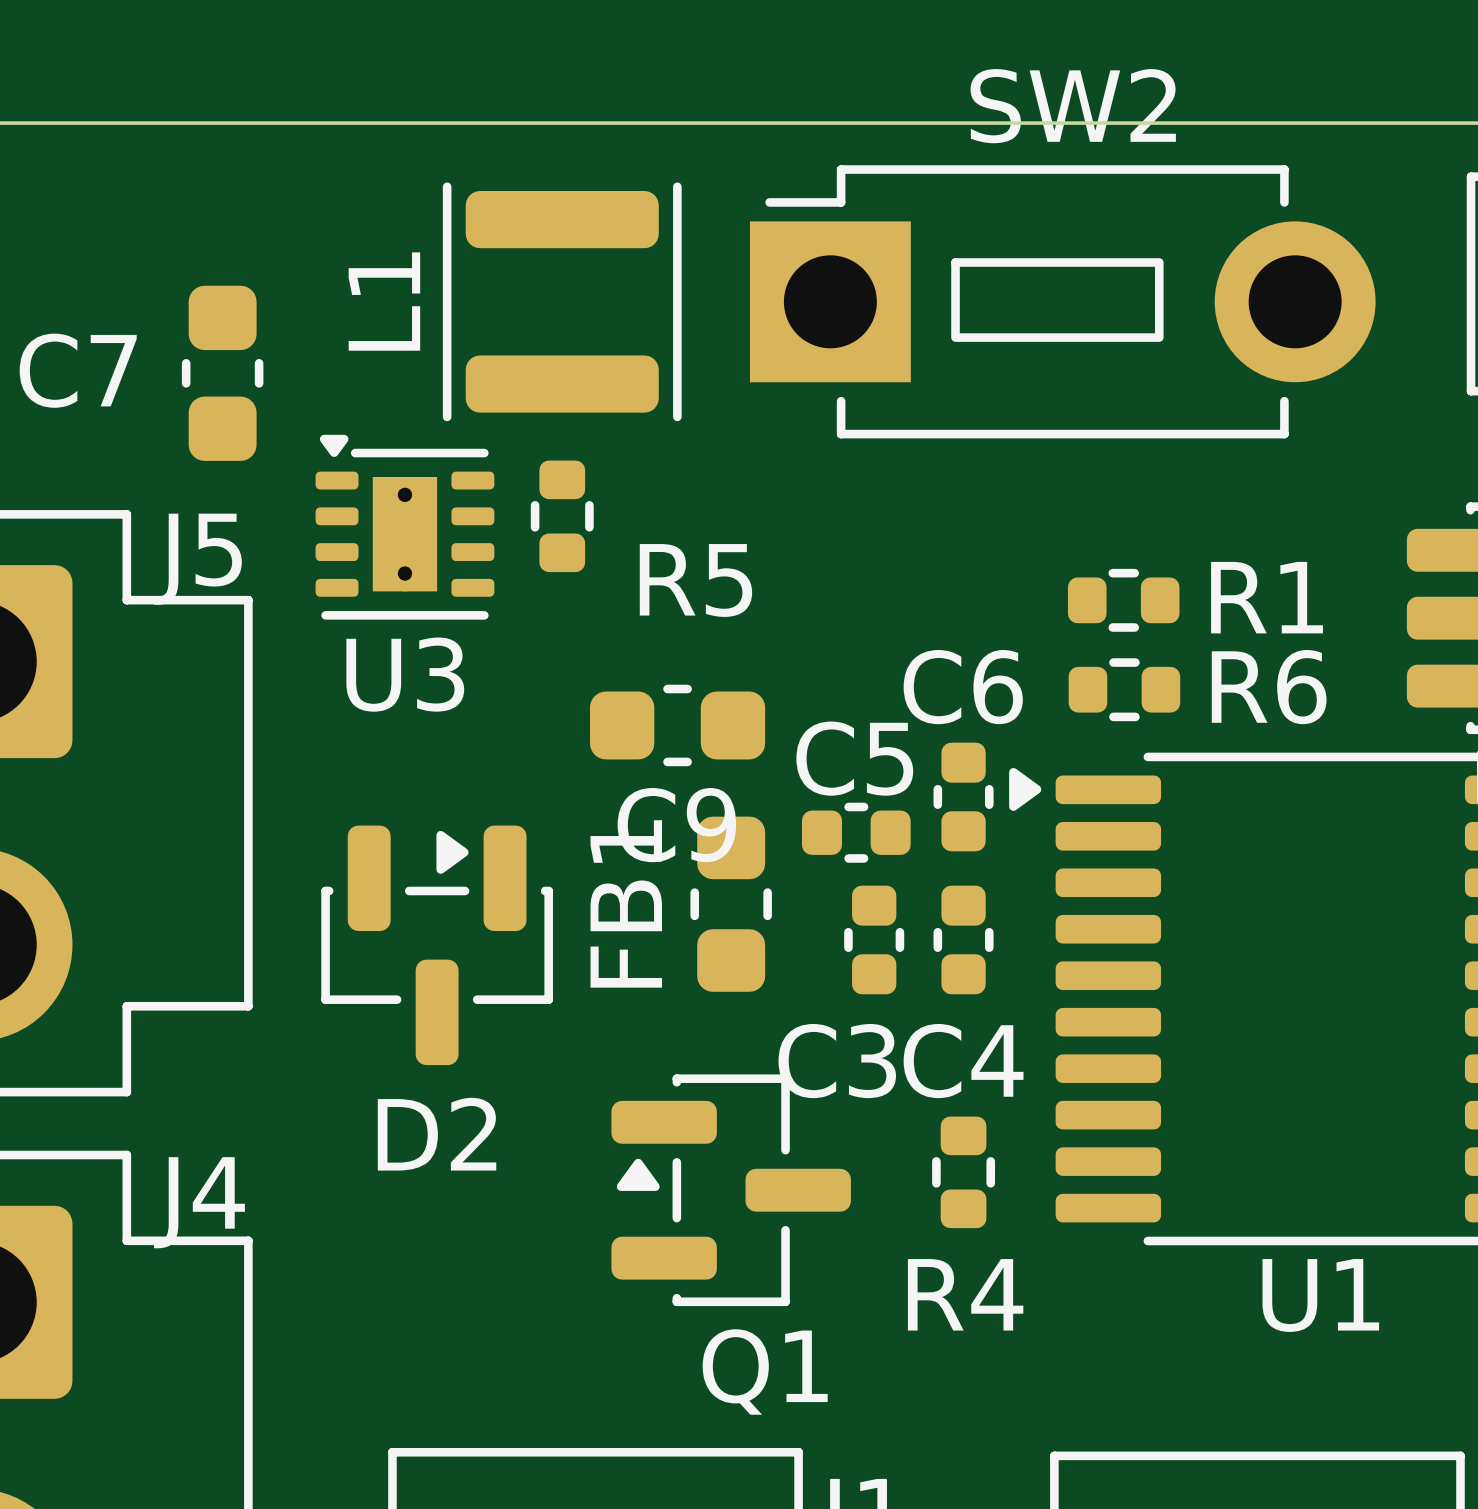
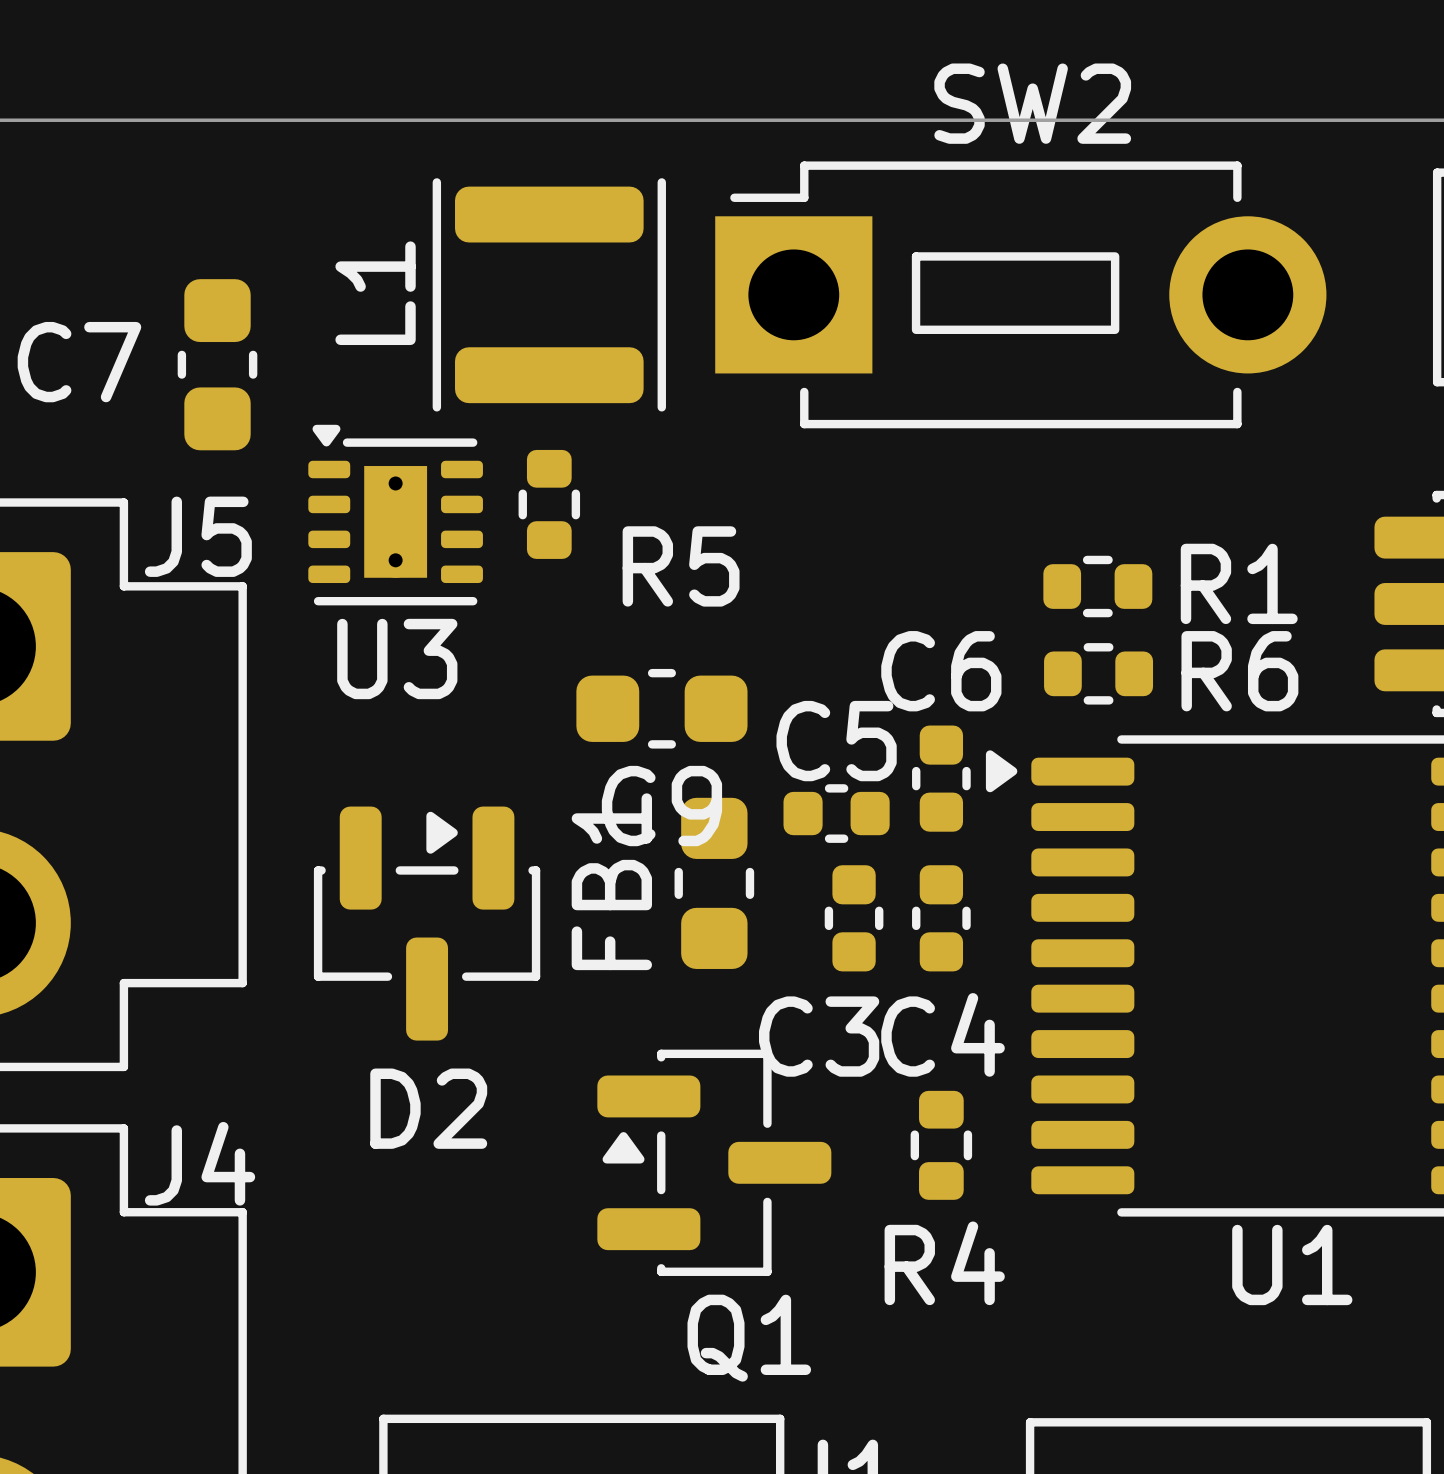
SW2 position: (1062, 301) -> (1020, 294)

